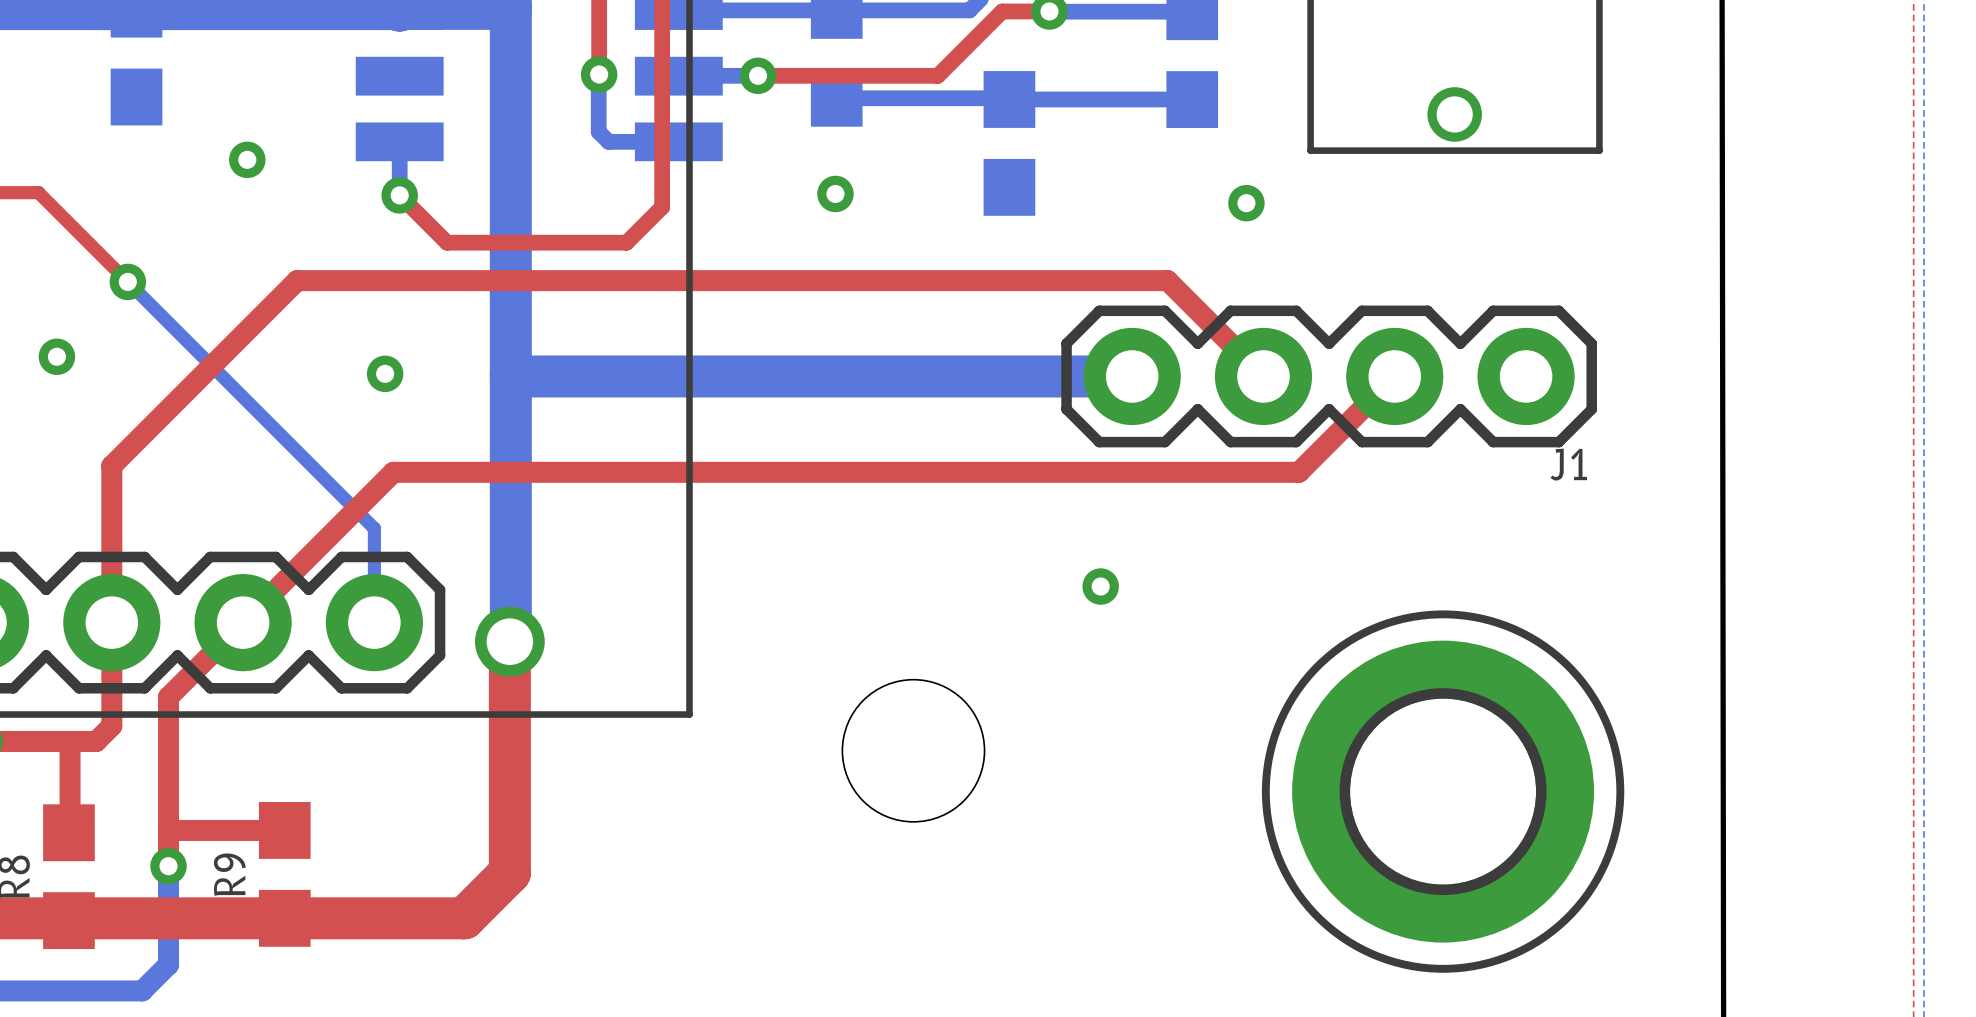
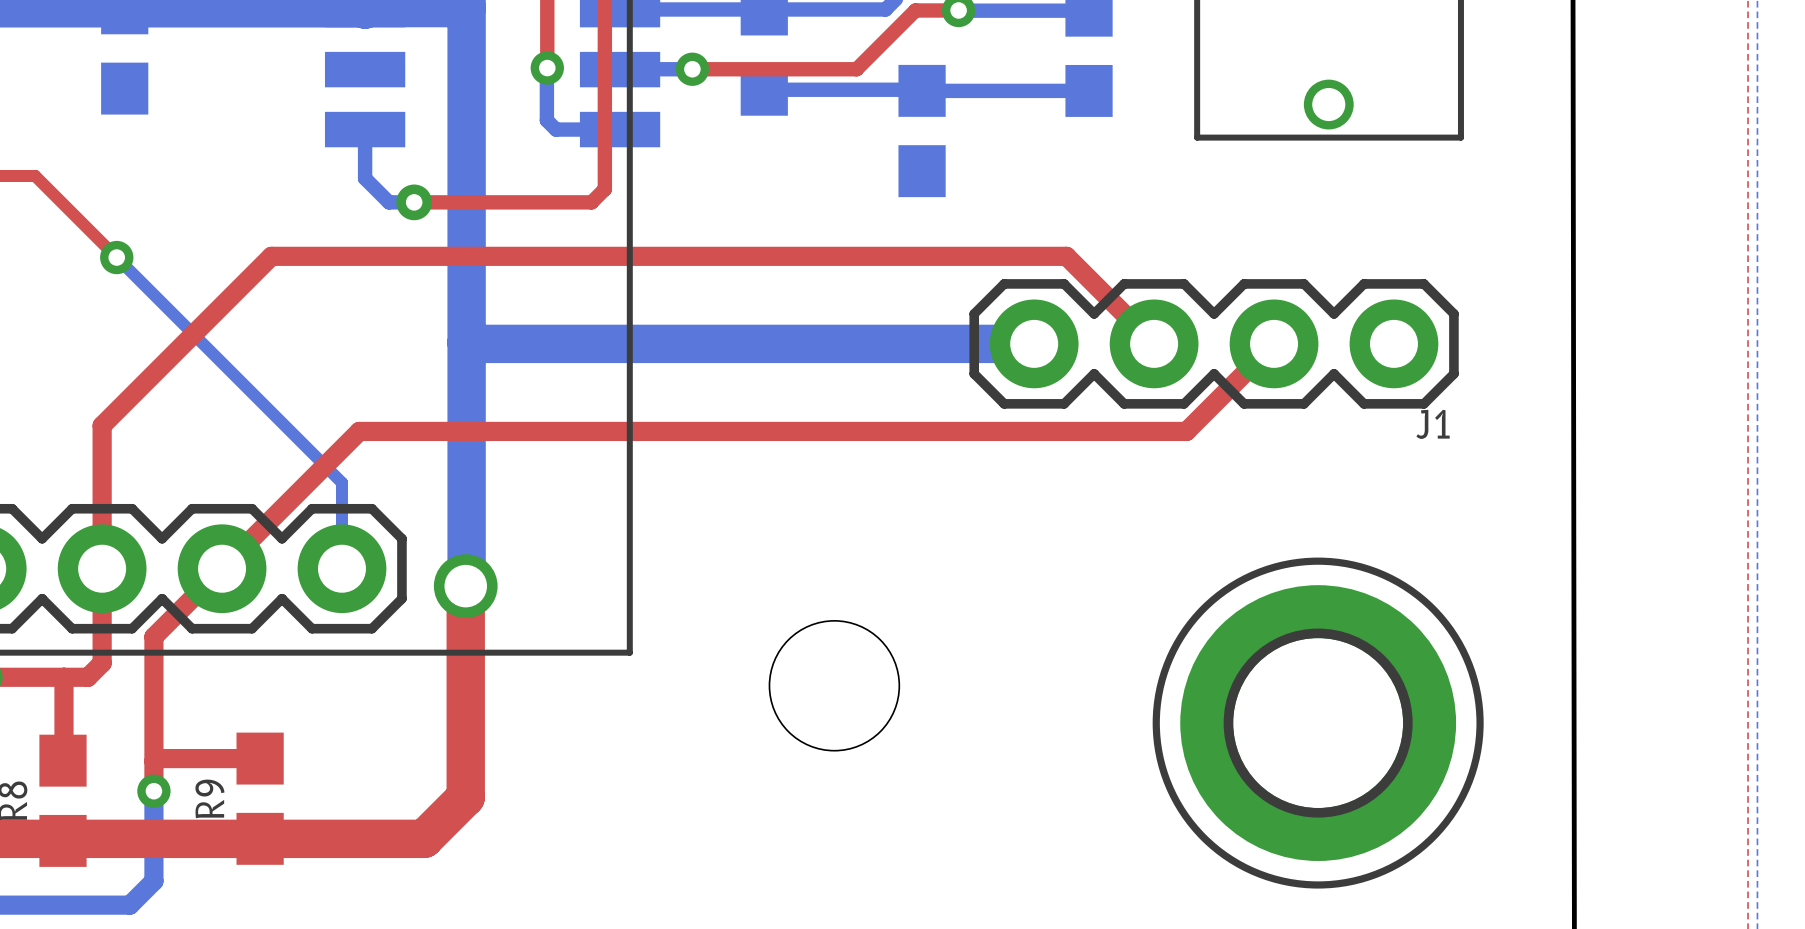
via: (247, 159) -> none
via: (835, 193) -> none
bottom track: none -> (365, 178) (388, 202) (414, 202)
top track: (399, 195) (447, 242) (626, 242) (647, 221) -> (414, 202) (591, 202)
via: (399, 195) -> none
via: (1246, 203) -> none
via: none -> (414, 202)
via: (56, 356) -> none
via: (385, 373) -> none
via: (1100, 586) -> none

